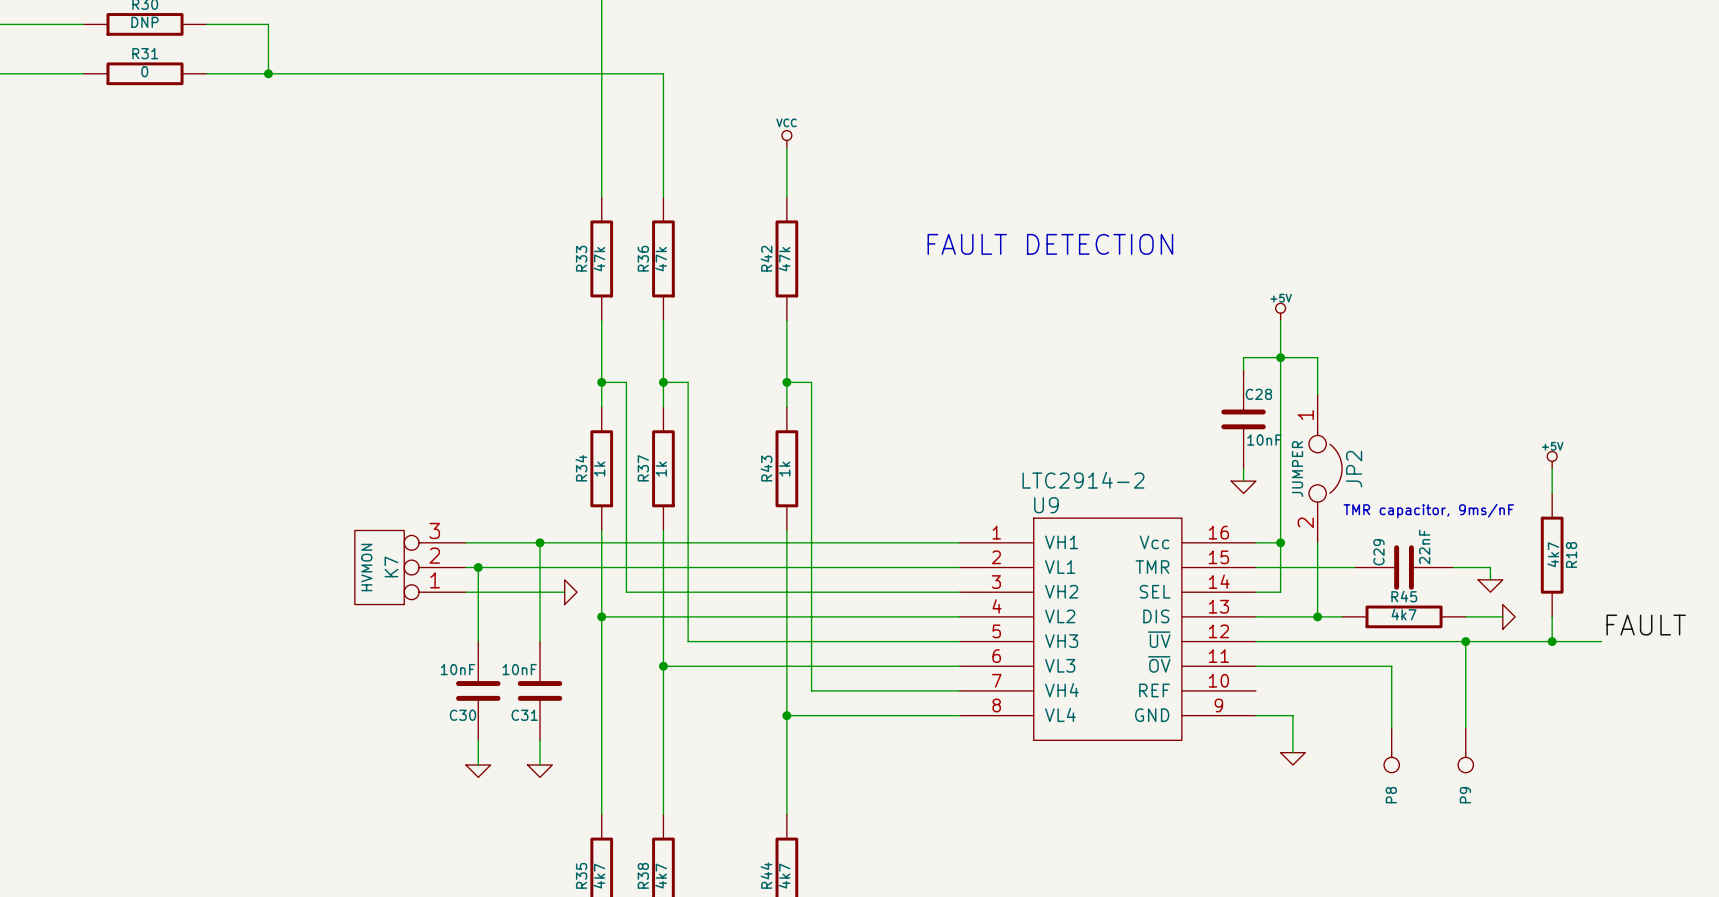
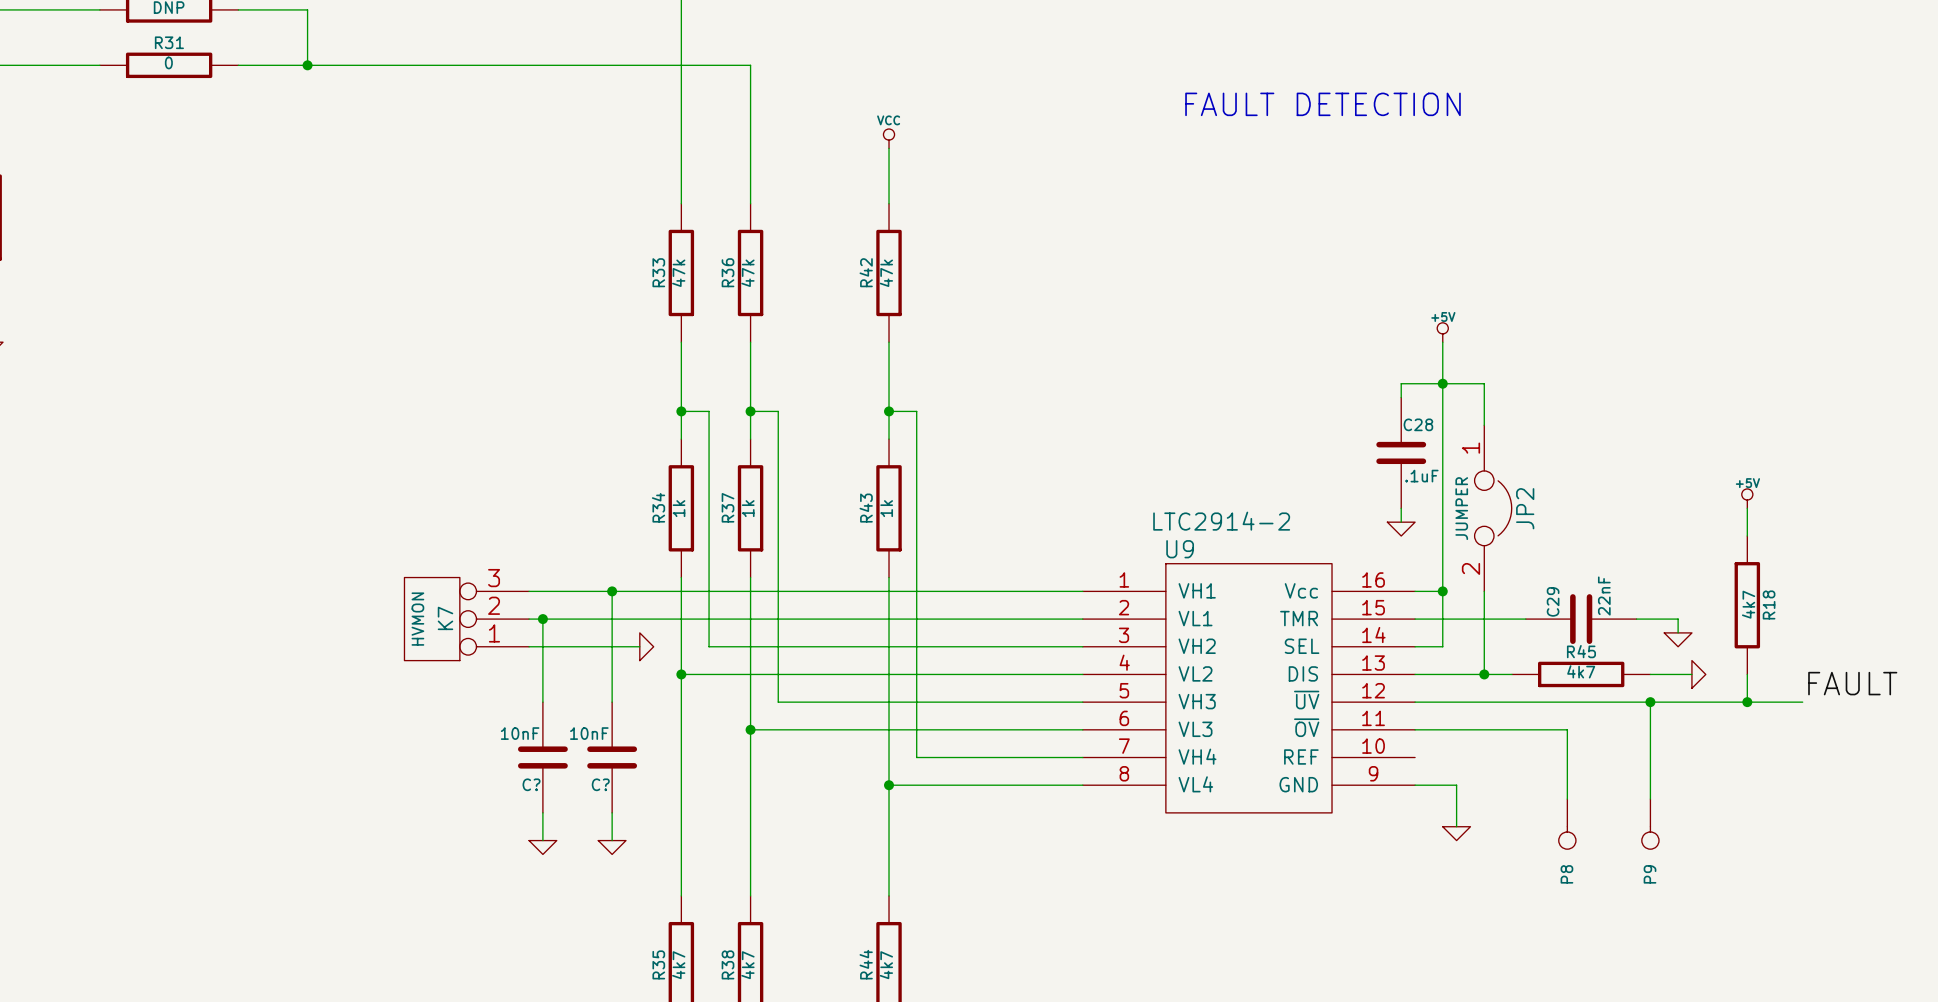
text position: FAULT DETECTION (1050, 244) -> FAULT DETECTION (1322, 104)
C28 value: 10nF (1264, 440) -> .1uF (1421, 476)
text: TMR capacitor, 9ms/nF (1428, 511) -> none
C30 name: C30 (462, 715) -> C? (531, 784)
C31 name: C31 (524, 715) -> C? (600, 784)

